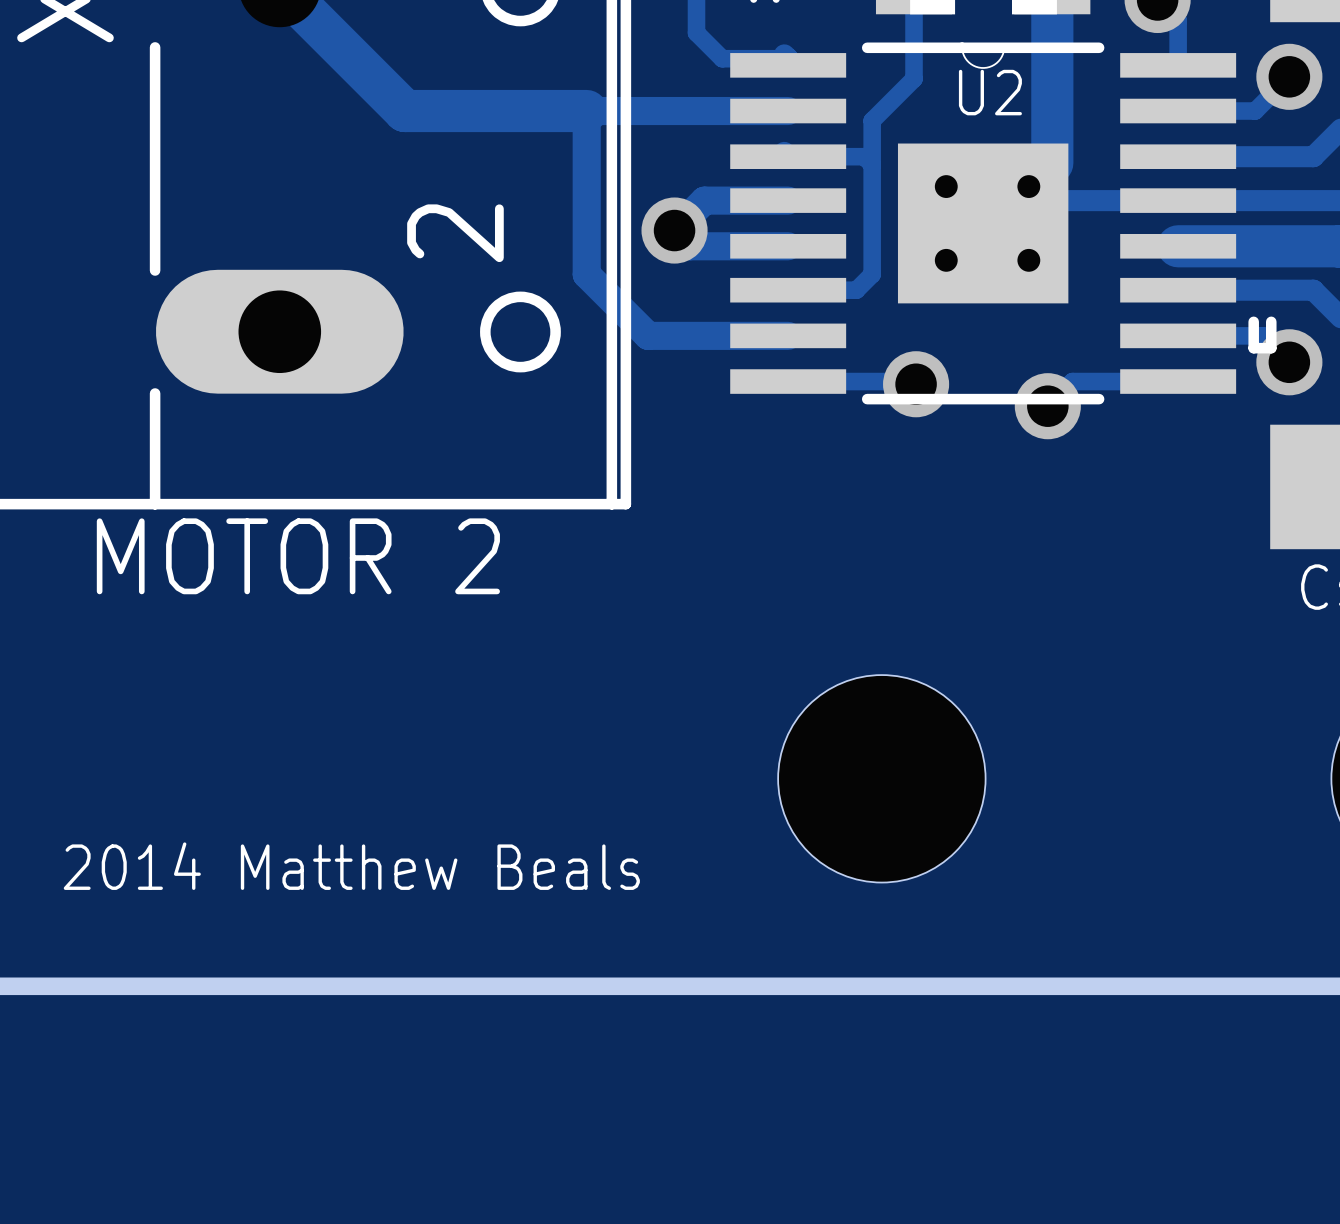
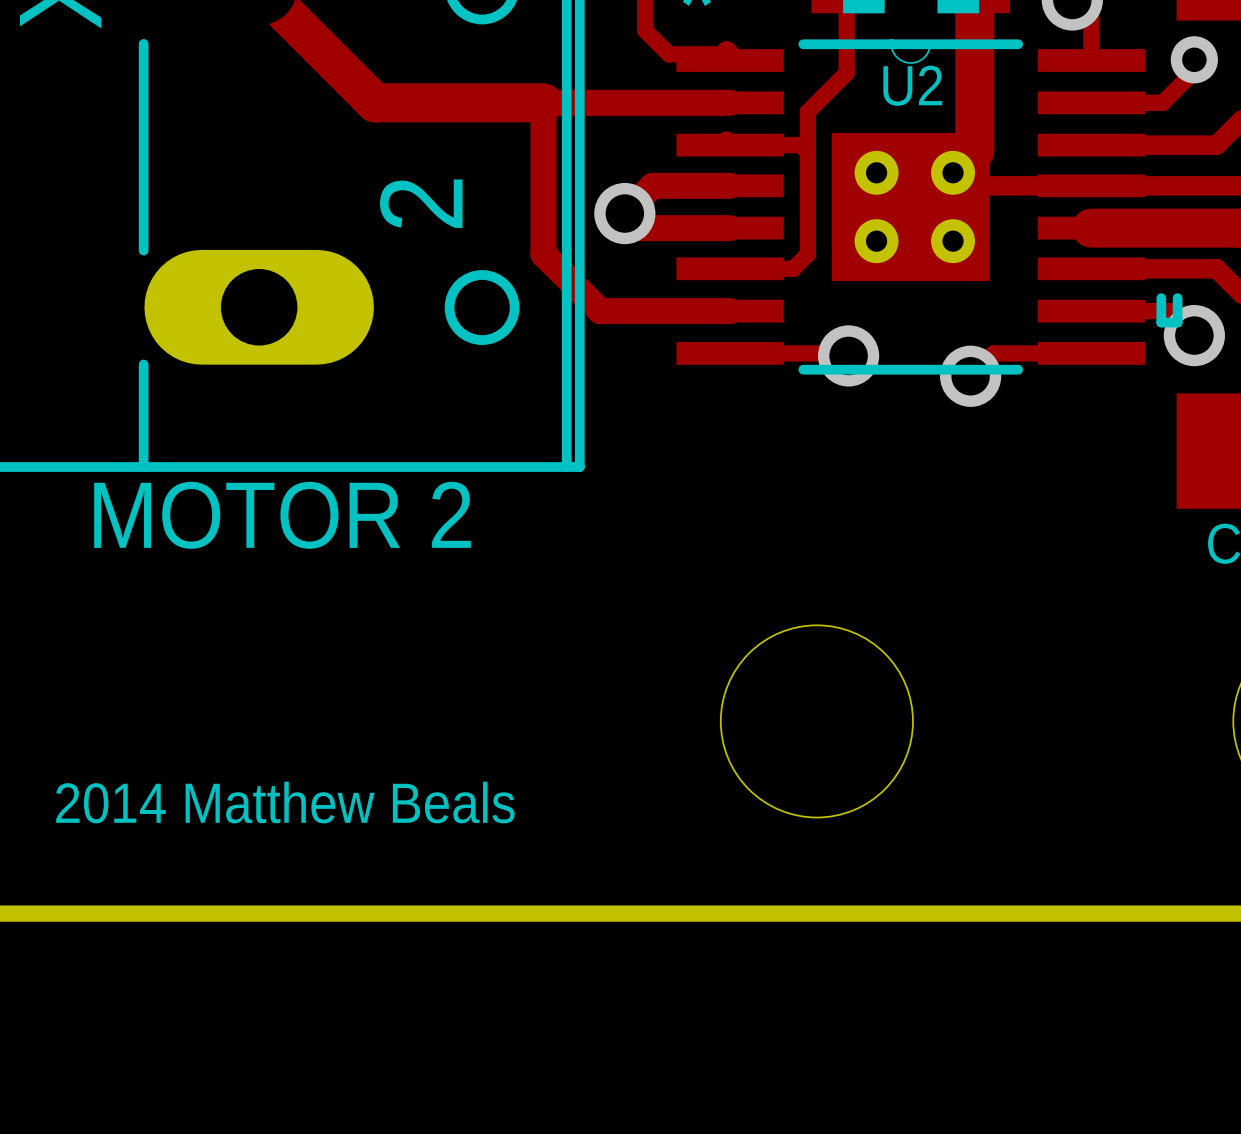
via size: [1256, 43, 1323, 110] -> [1170, 36, 1218, 84]

